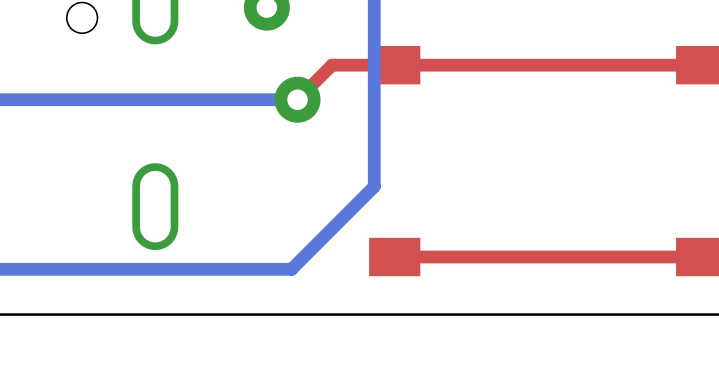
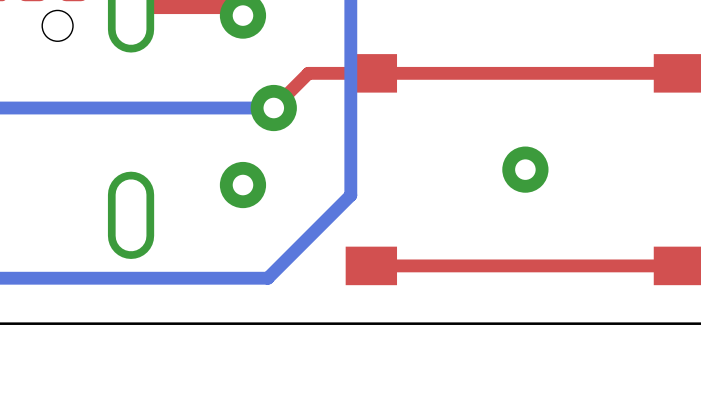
via: none -> (525, 169)
via: none -> (242, 185)

